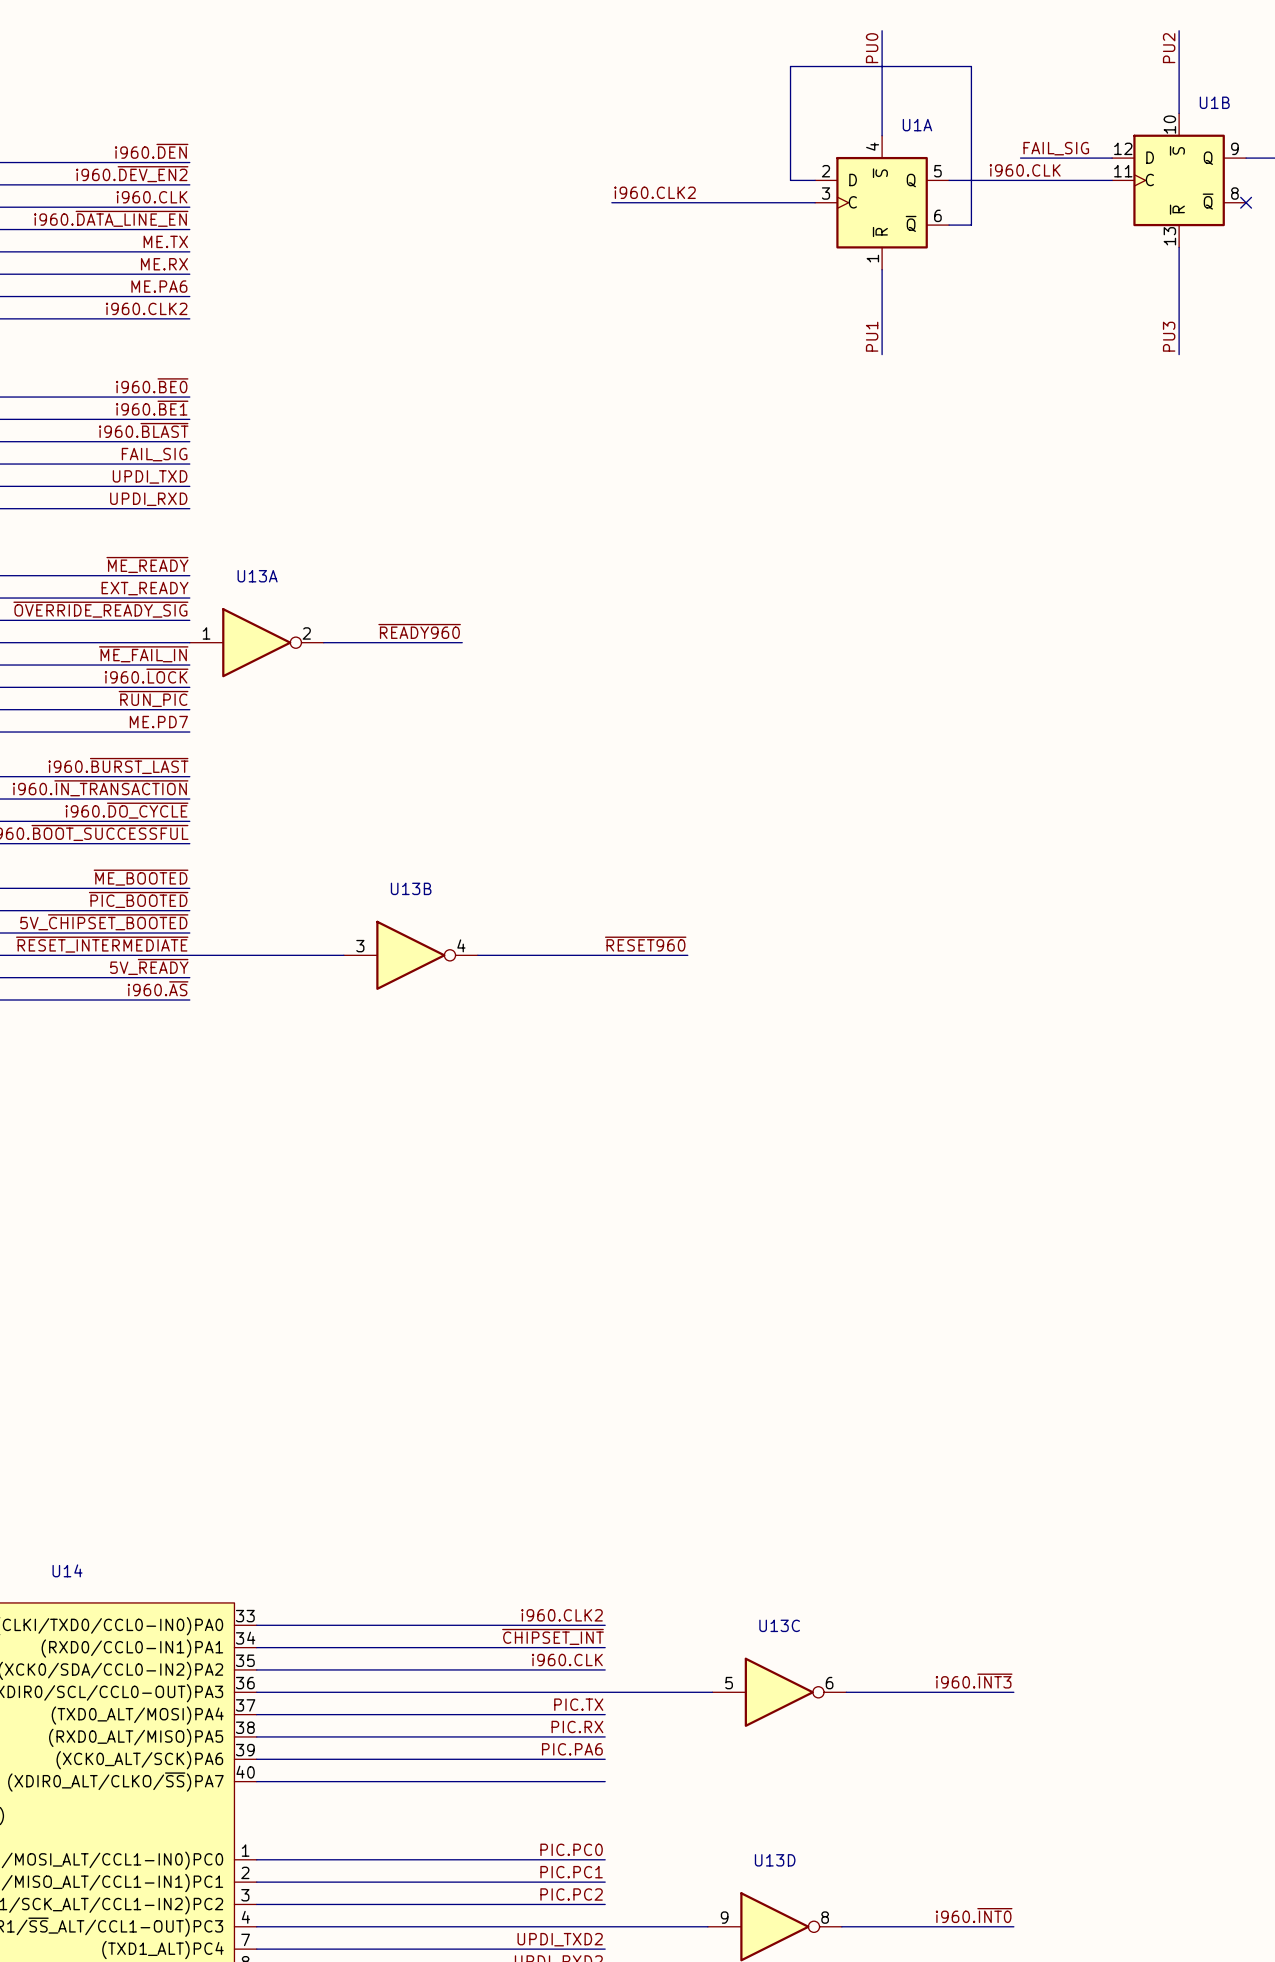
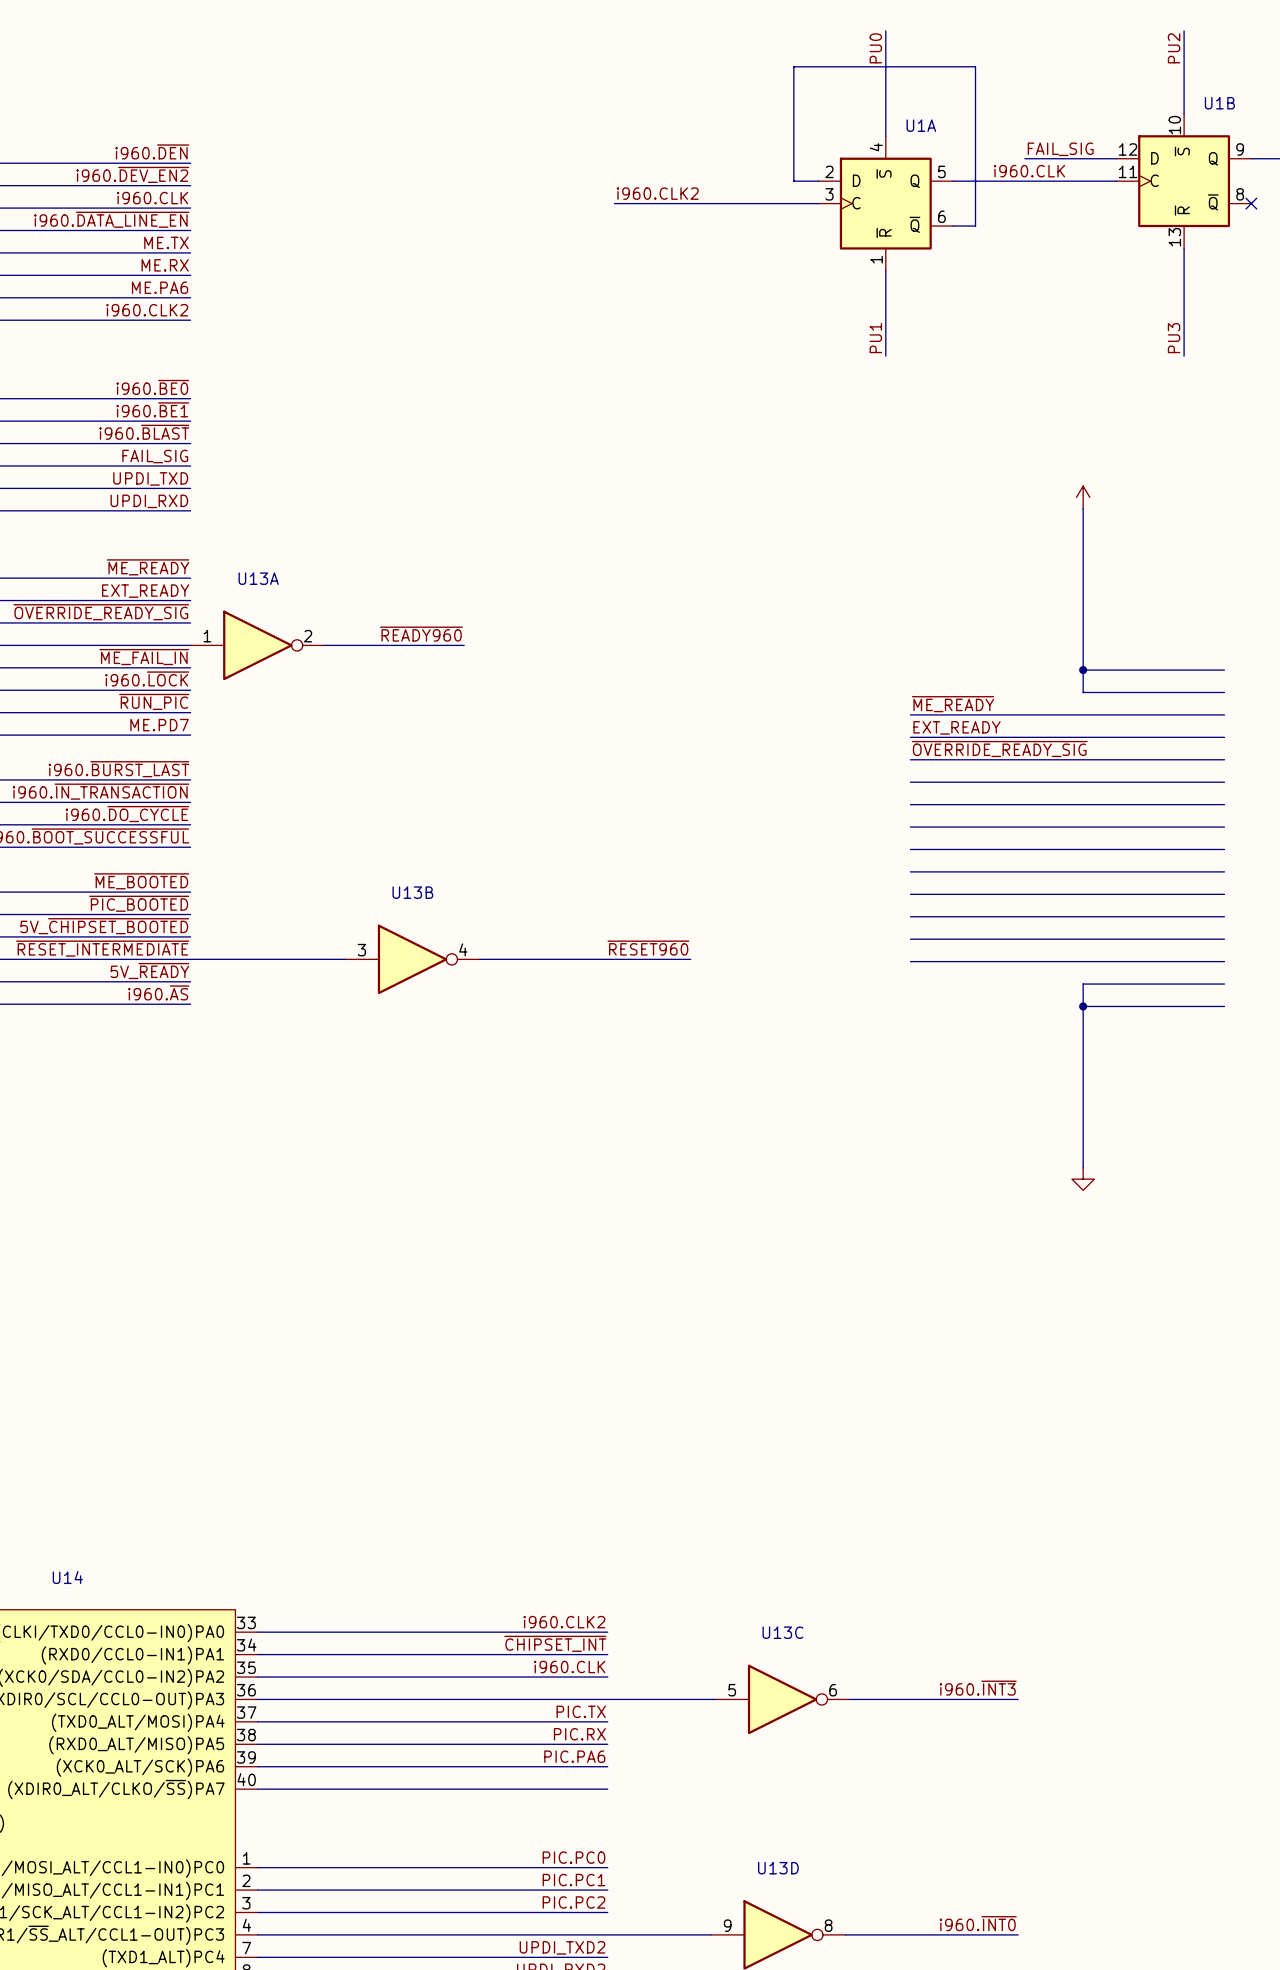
power symbol: none -> (1083, 497)
wire: none -> (1083, 508) (1083, 692) (1224, 692)
wire: none -> (1083, 670) (1224, 670)
junction: none -> (1083, 670)
label: none -> ~{ME_READY} (953, 704)
wire: none -> (910, 714) (1224, 714)
label: none -> EXT_READY (957, 727)
wire: none -> (910, 737) (1224, 737)
label: none -> ~{OVERRIDE_READY_SIG} (999, 749)
wire: none -> (910, 759) (1224, 759)
wire: none -> (910, 782) (1224, 782)
wire: none -> (910, 804) (1224, 804)
wire: none -> (910, 827) (1224, 827)
wire: none -> (910, 849) (1224, 849)
wire: none -> (910, 871) (1224, 871)
wire: none -> (910, 894) (1224, 894)
wire: none -> (910, 916) (1224, 916)
wire: none -> (910, 939) (1224, 939)
wire: none -> (910, 961) (1224, 961)
wire: none -> (1224, 984) (1083, 984) (1083, 1167)
wire: none -> (1083, 1006) (1224, 1006)
junction: none -> (1083, 1006)
power symbol: none -> (1083, 1179)

